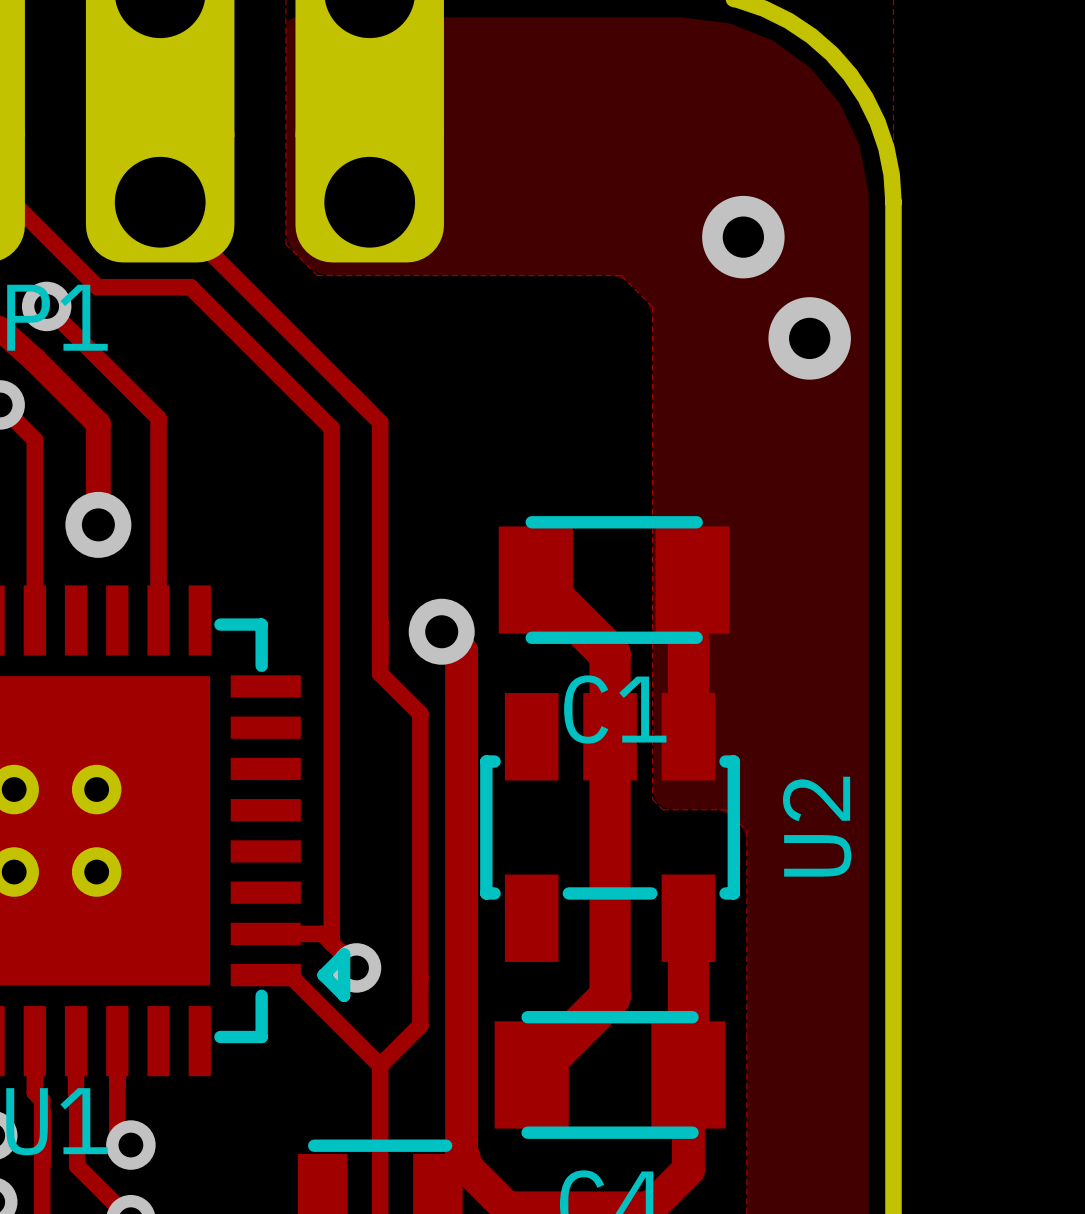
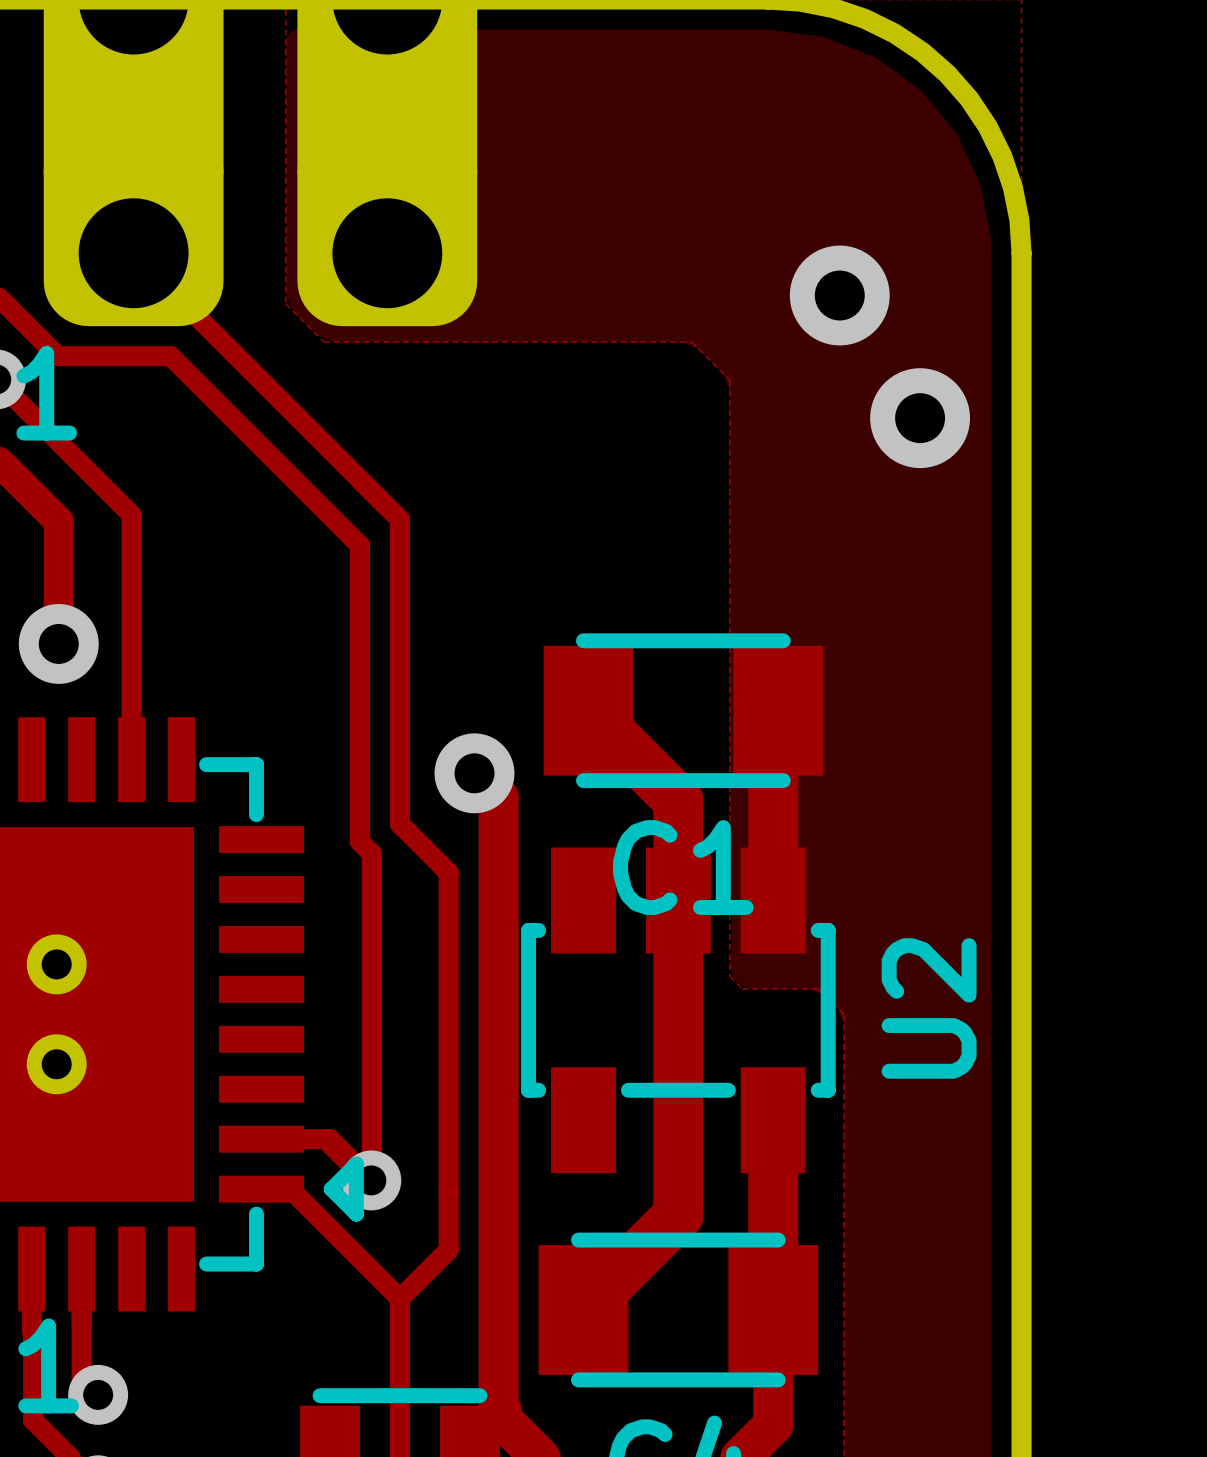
track: (331, 428) (331, 943) -> (341, 526) (360, 545) (360, 841) (371, 853) (371, 1185) (325, 1139)

